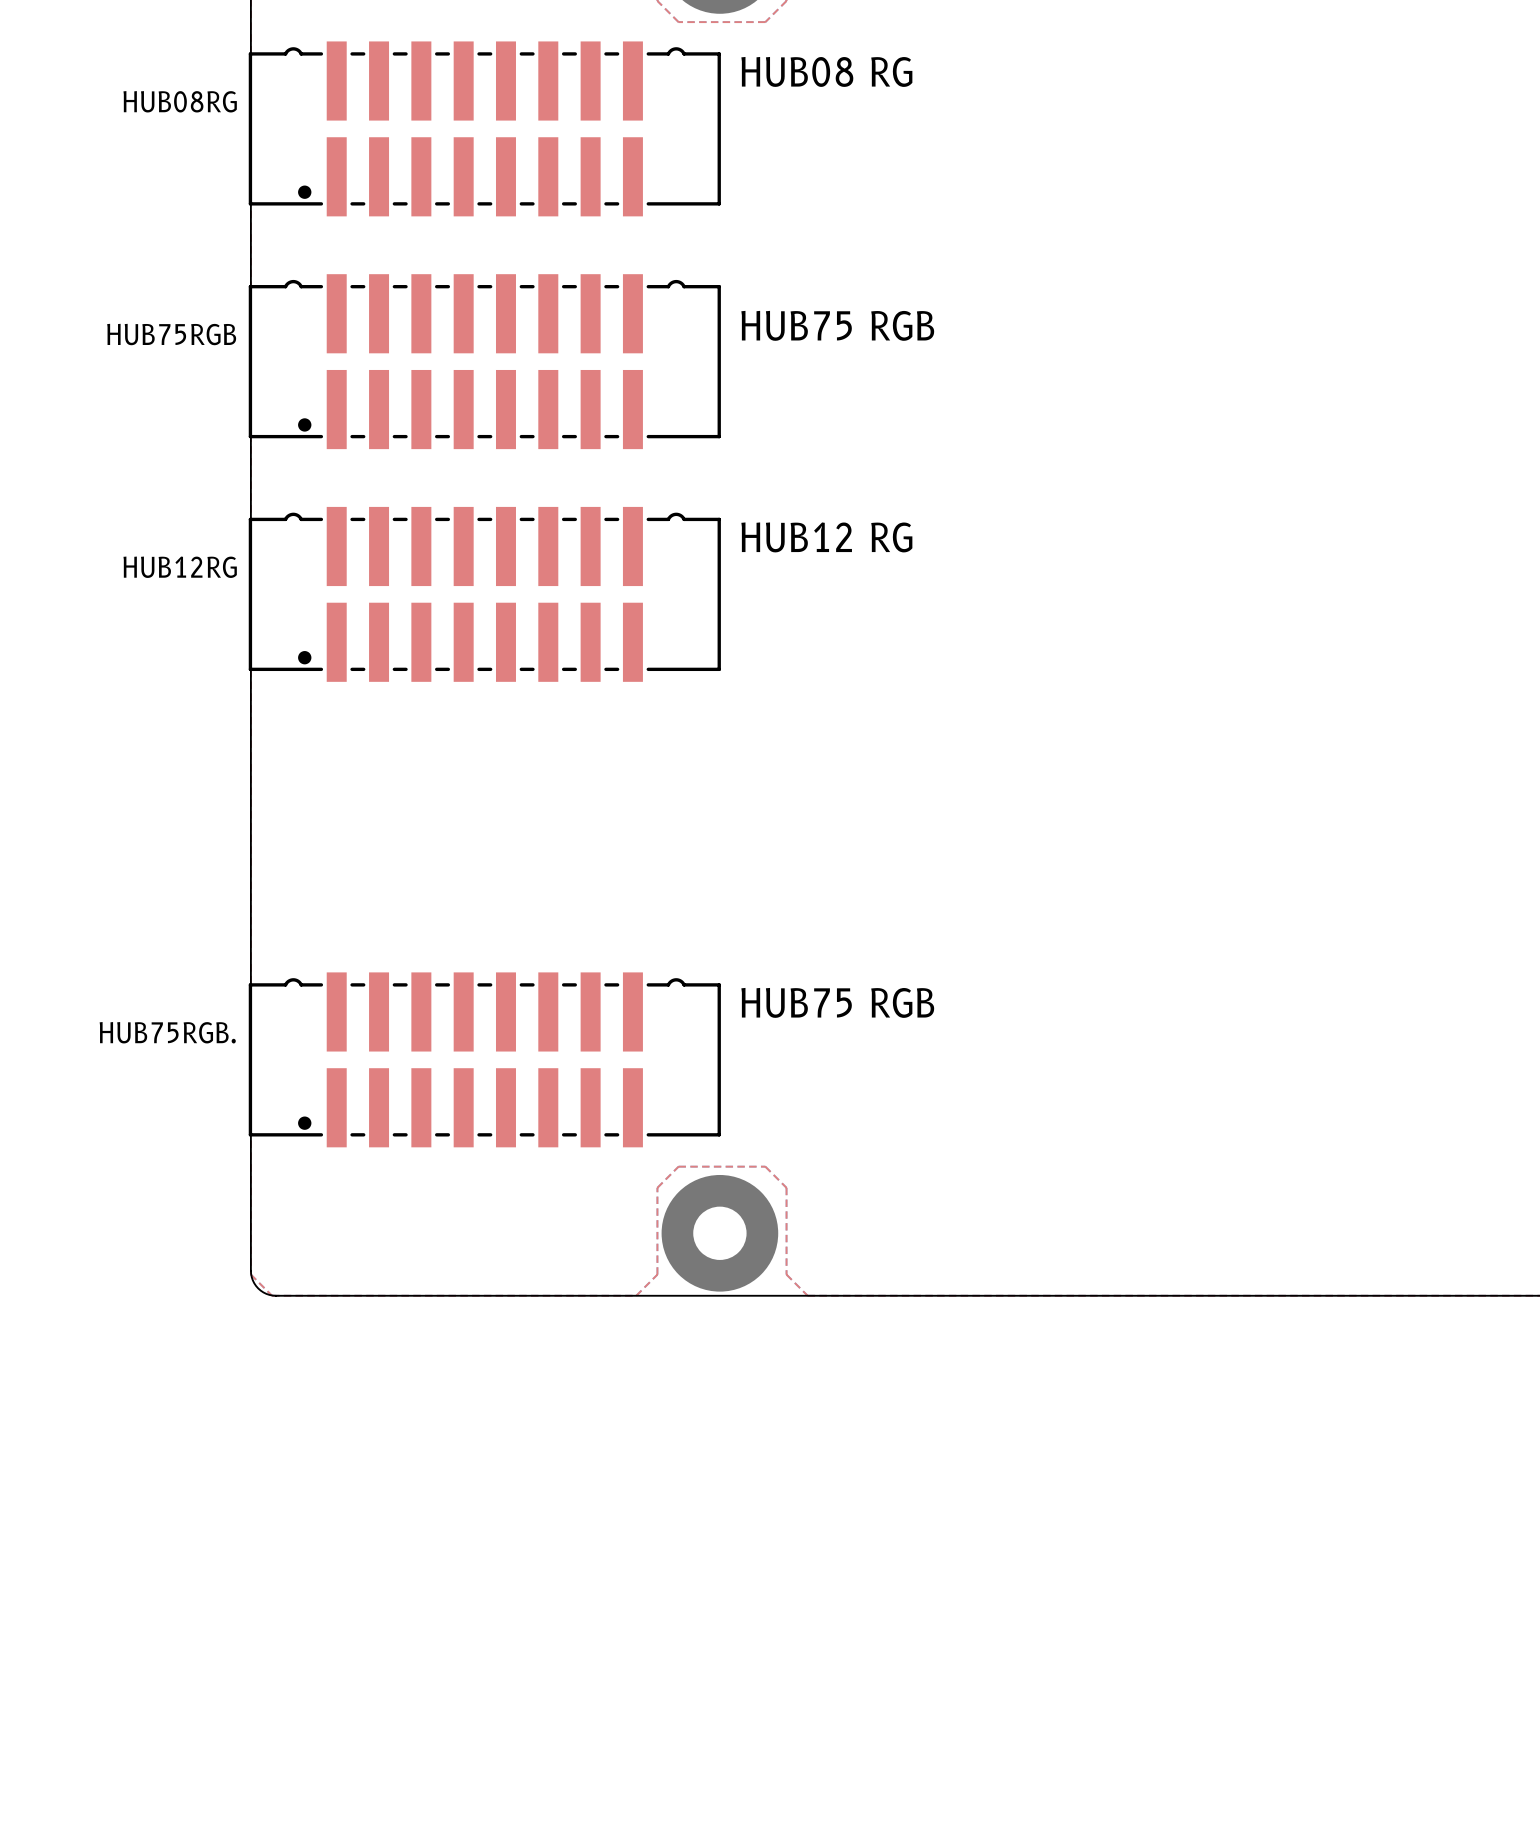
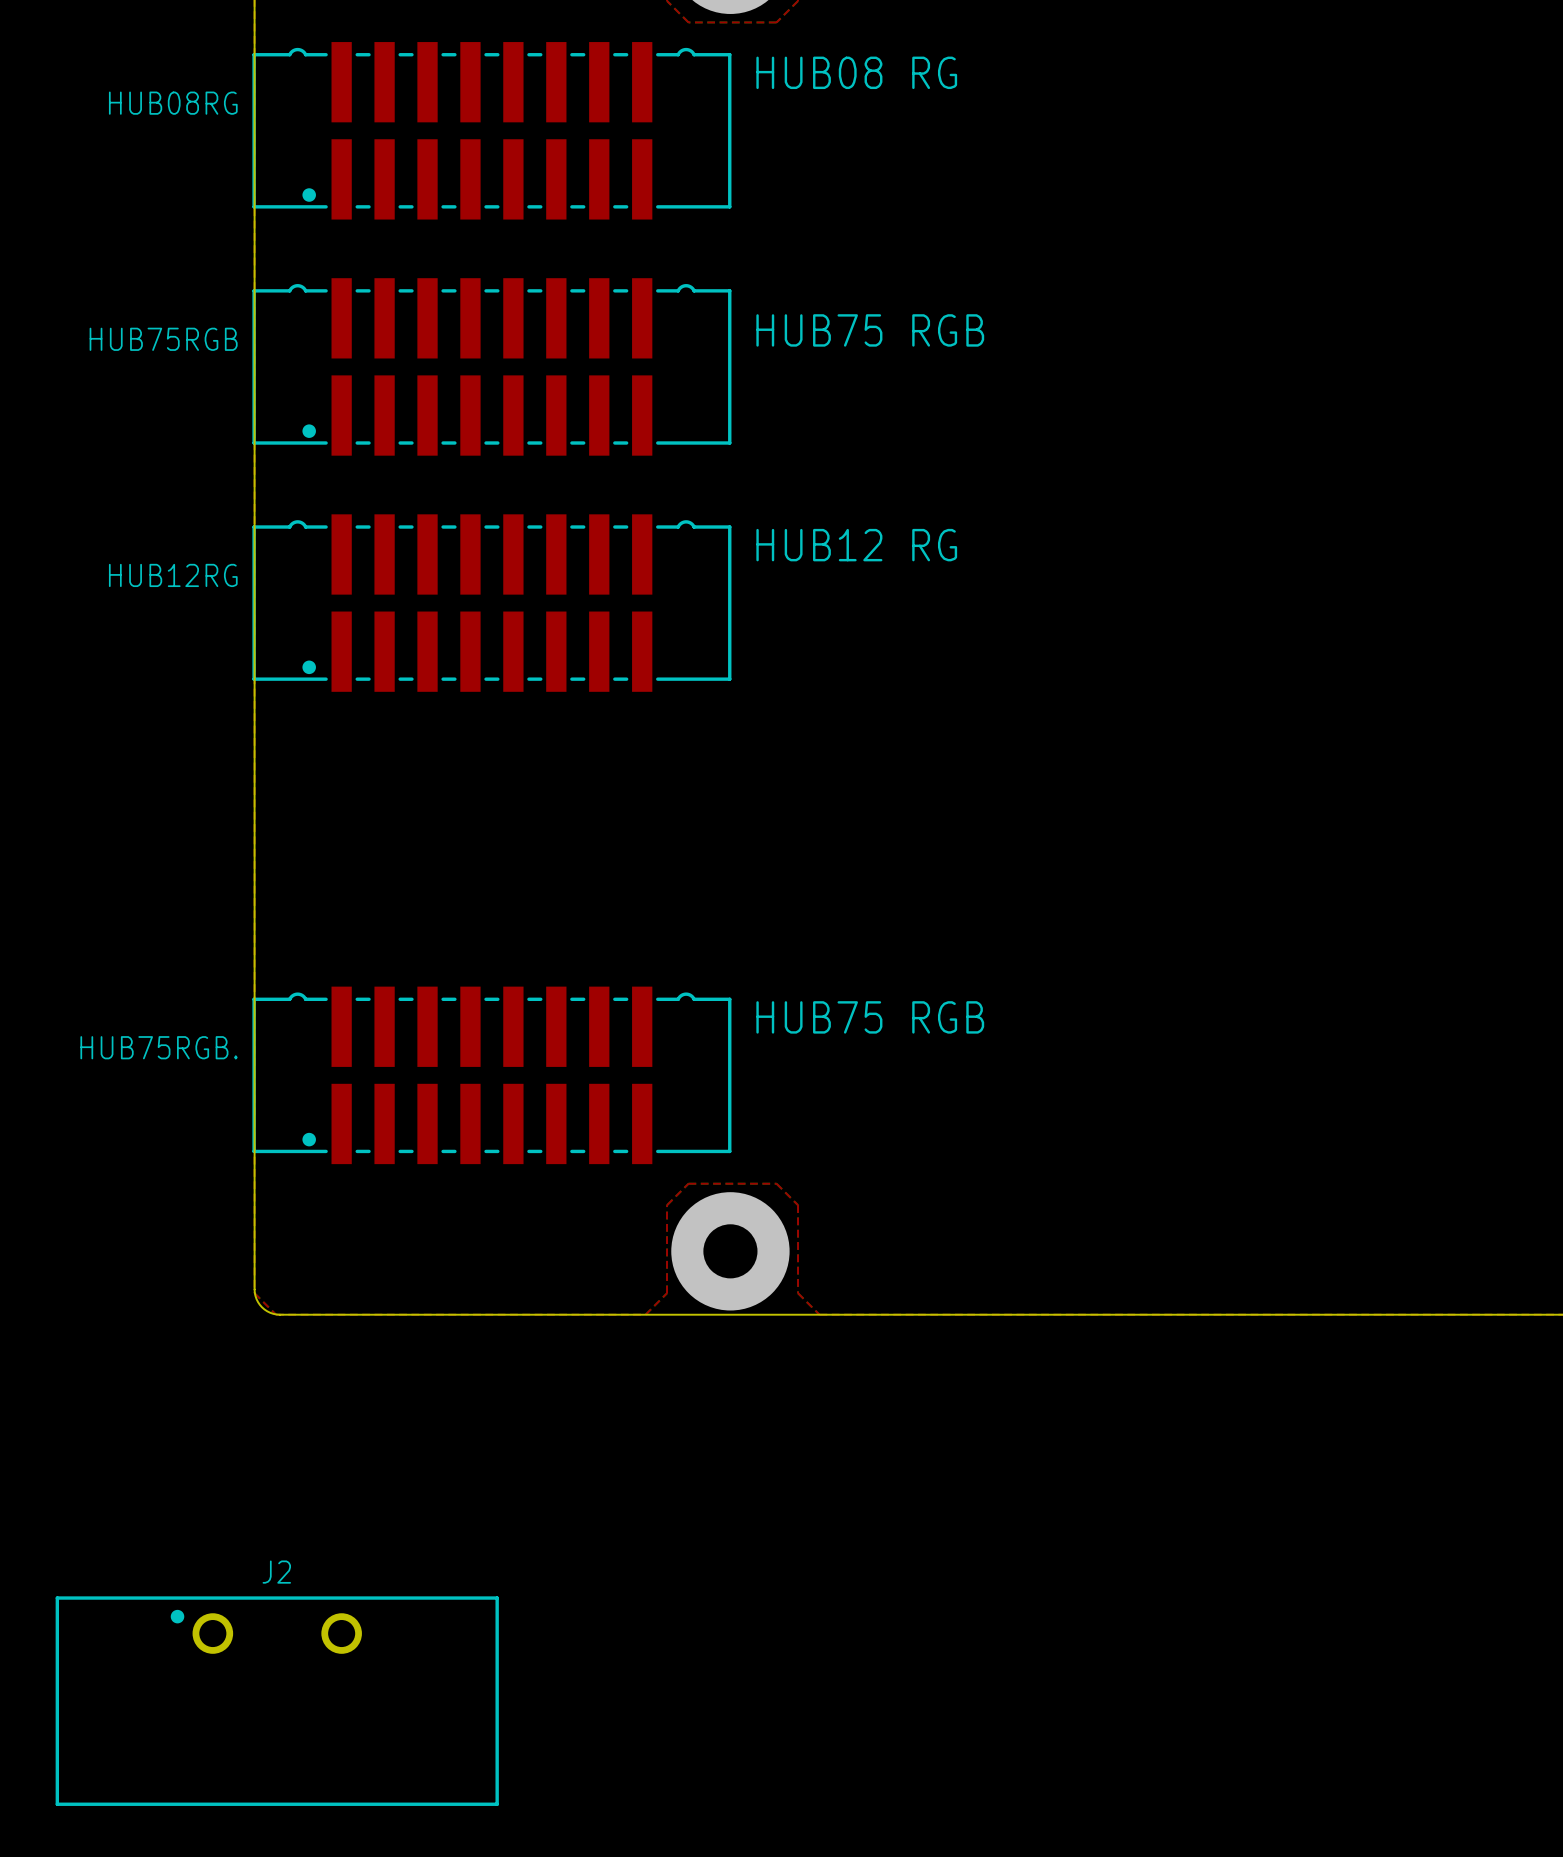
J2: none -> (277, 1701)

